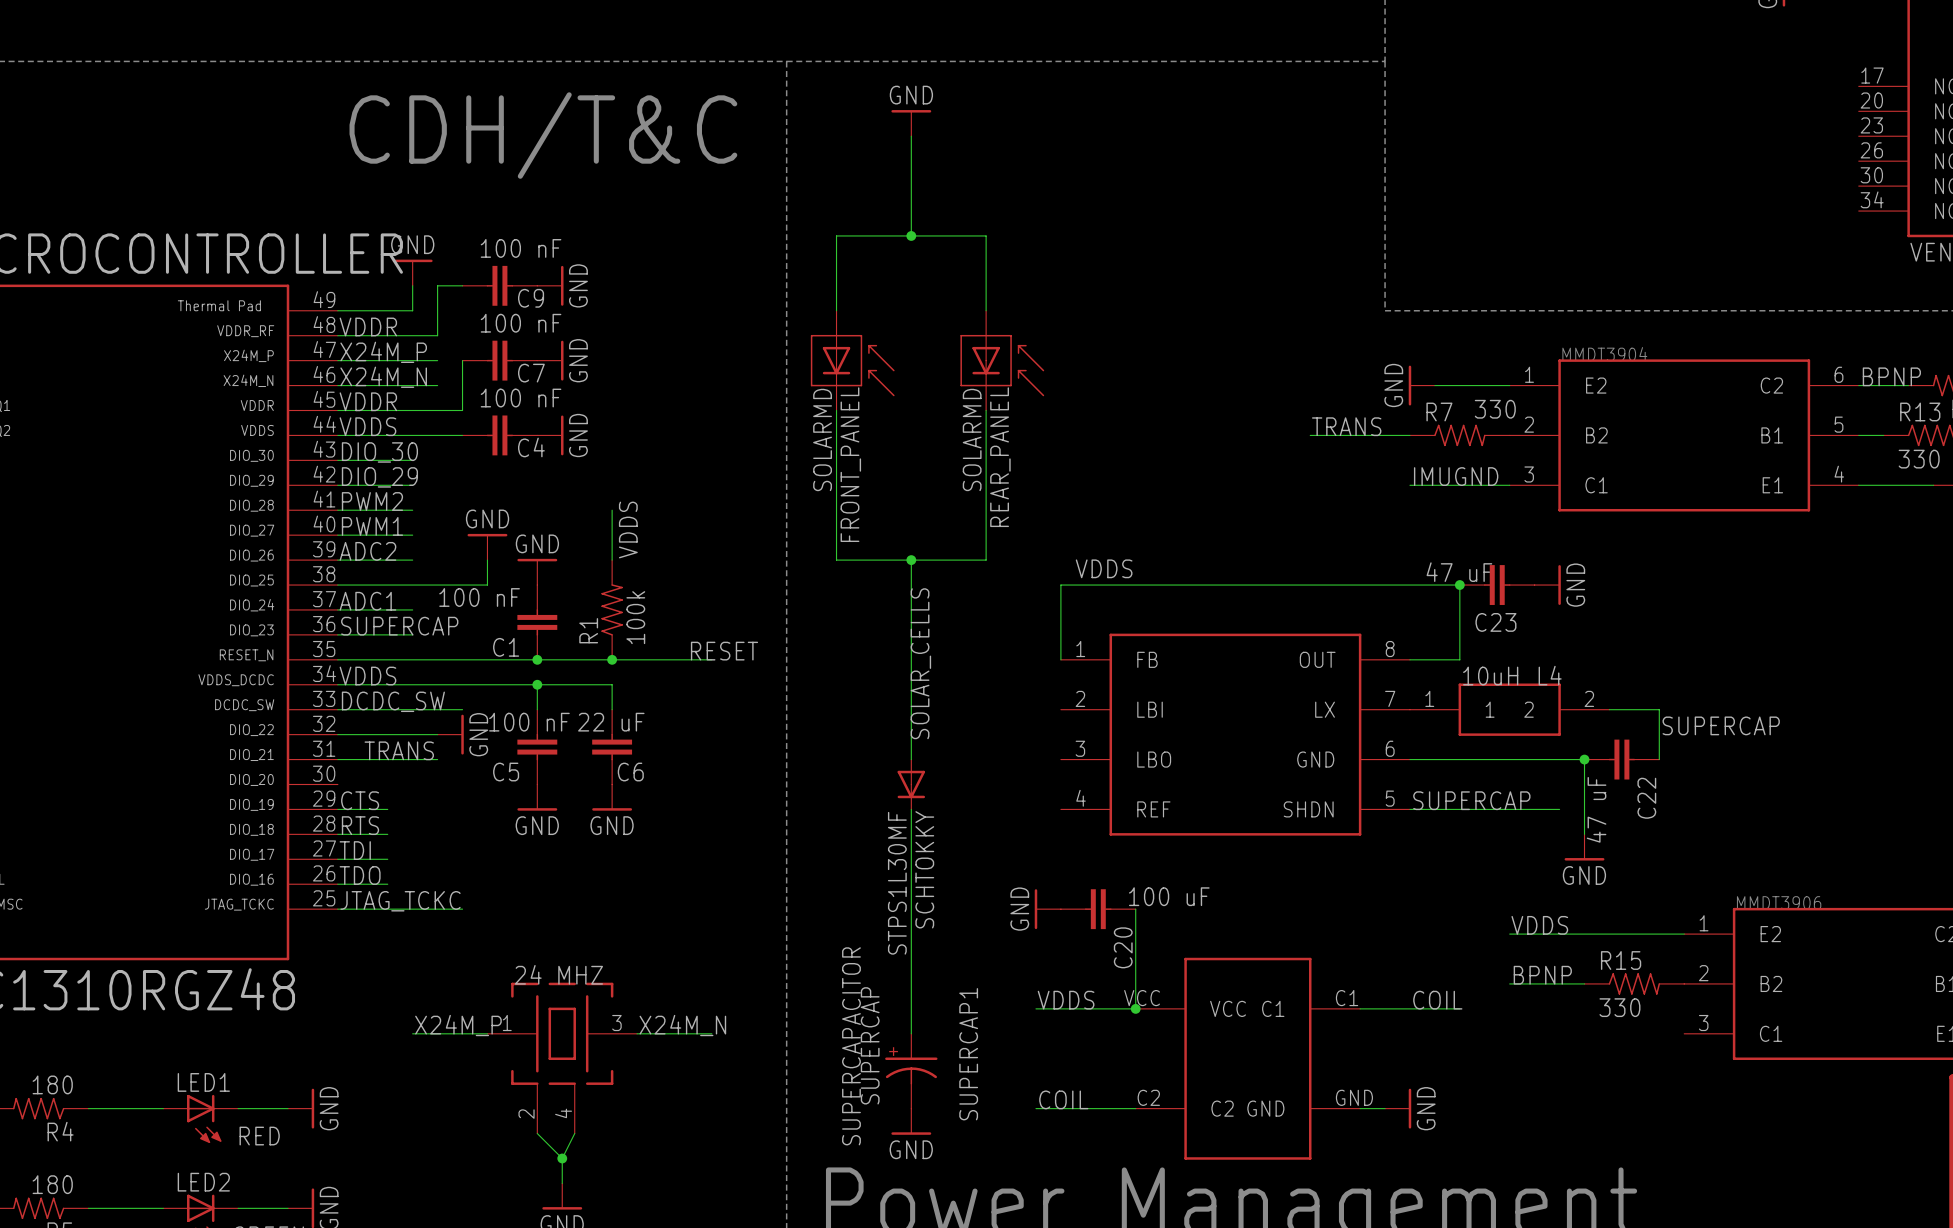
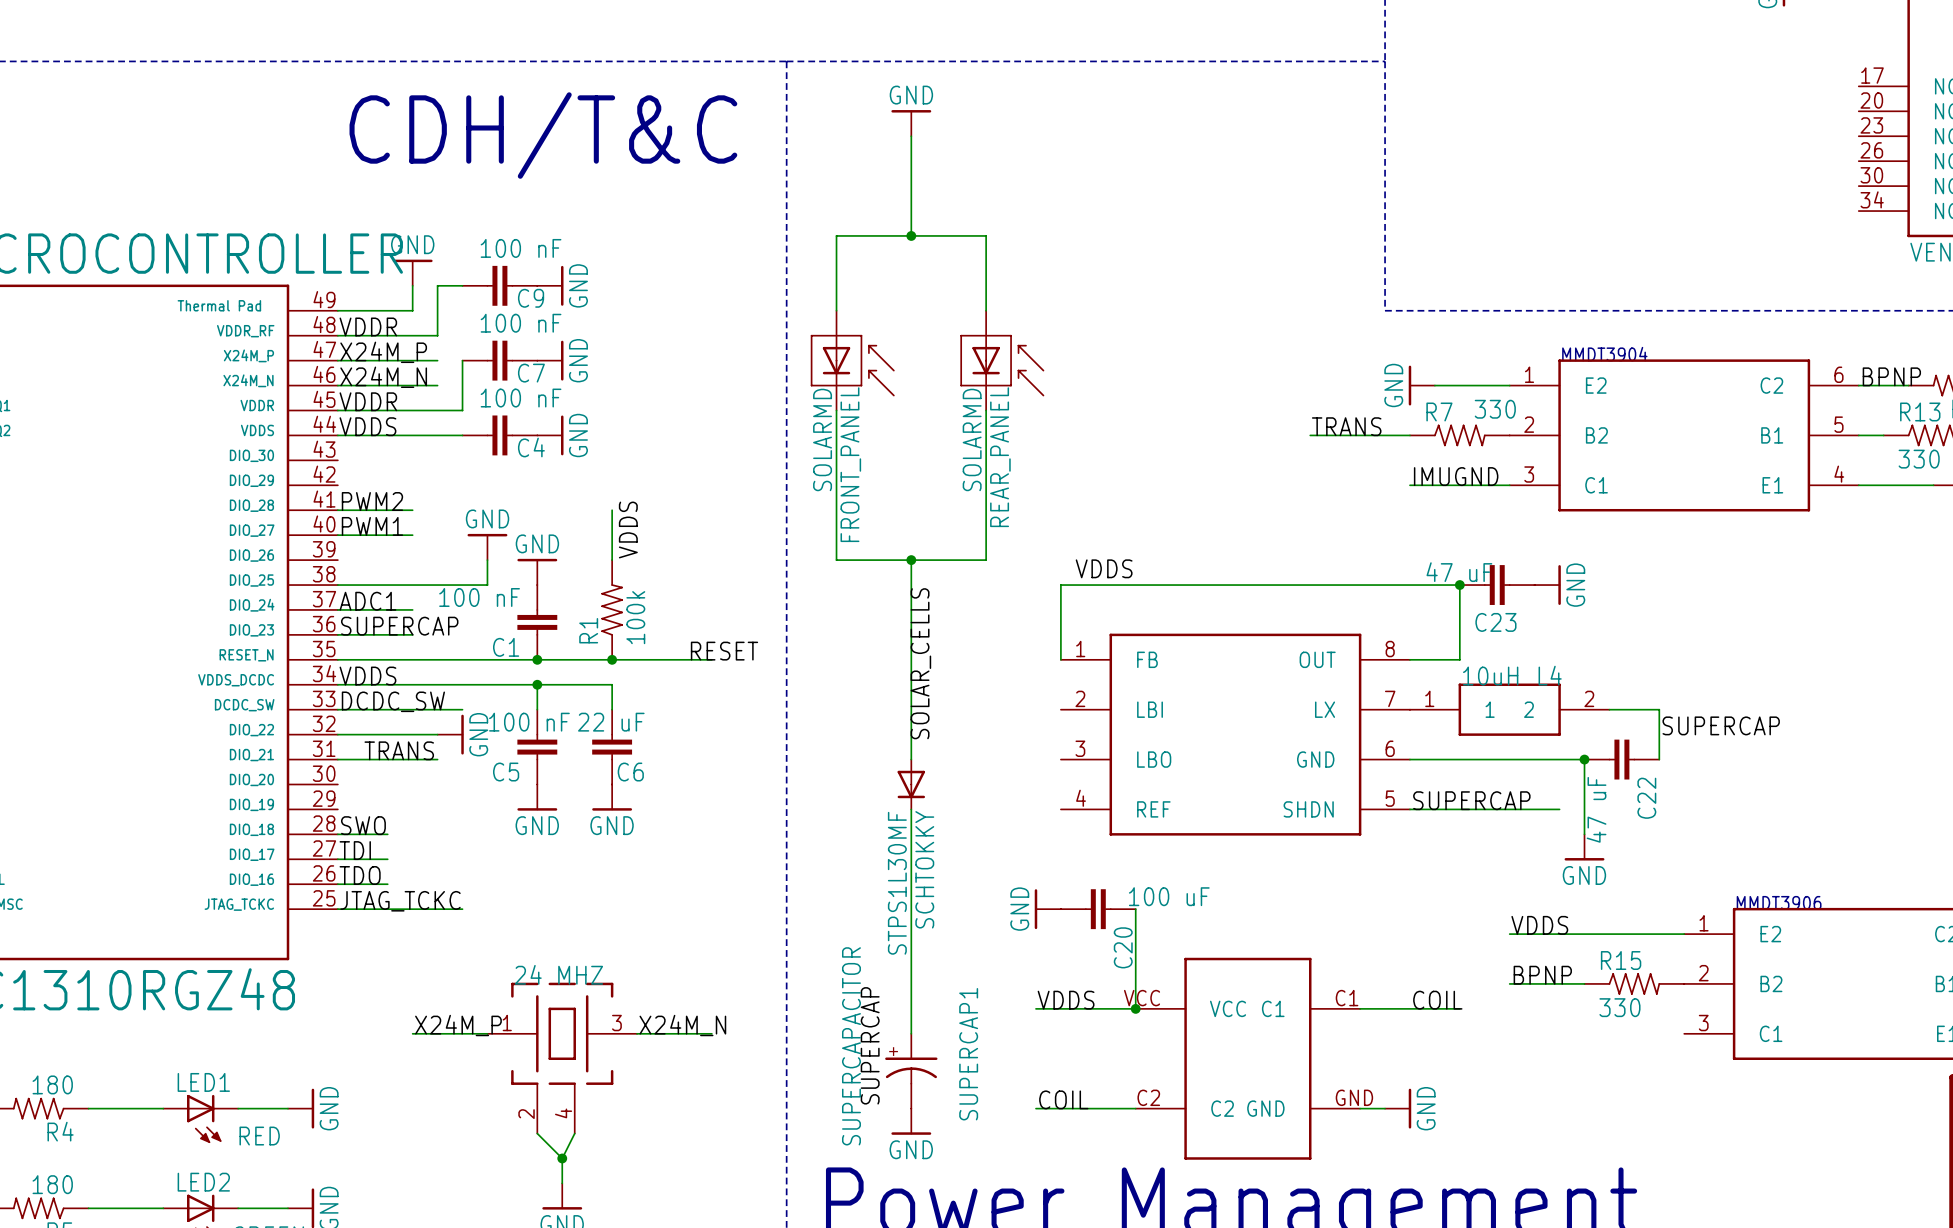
label: DIO_30 (379, 452) -> none
wire: (337, 460) (412, 460) -> none
label: DIO_29 (379, 477) -> none
wire: (337, 485) (412, 485) -> none
label: ADC2 (367, 551) -> none
wire: (337, 560) (412, 560) -> none
label: CTS (360, 800) -> none
wire: (337, 809) (387, 809) -> none
label: RTS (360, 825) -> SWO (363, 825)

